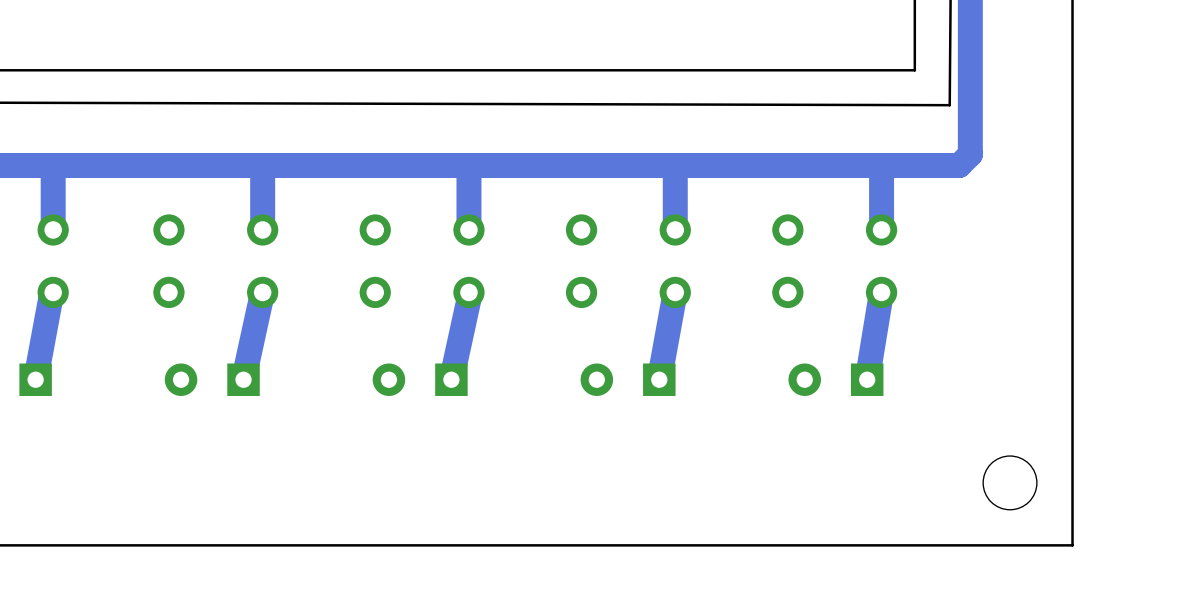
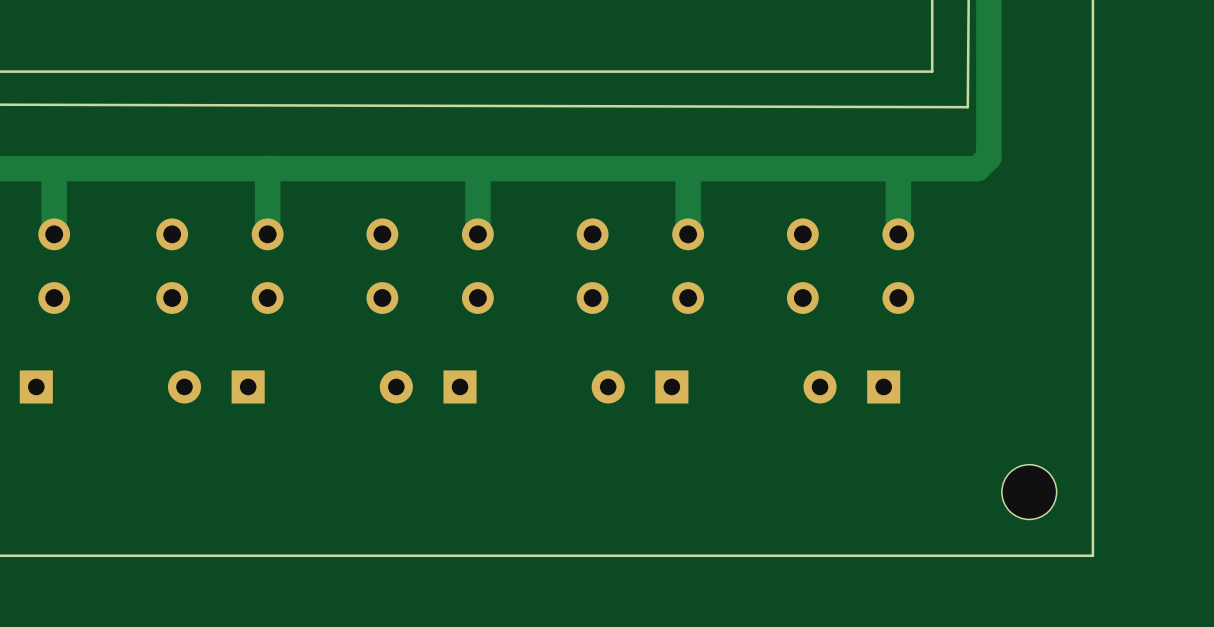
track: (262, 292) (243, 379) -> none
track: (470, 292) (451, 379) -> none
track: (675, 292) (659, 379) -> none
track: (881, 292) (867, 379) -> none
track: (51, 294) (35, 379) -> none

